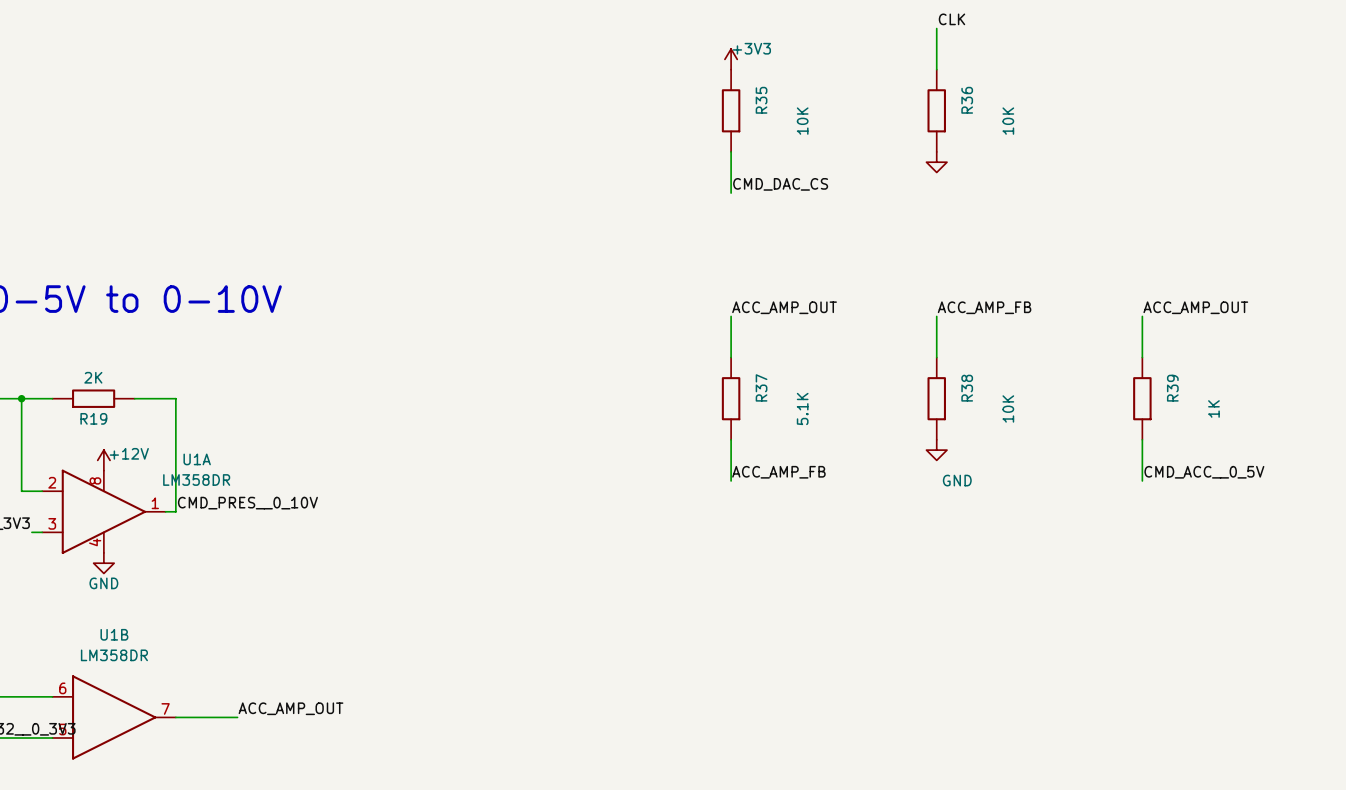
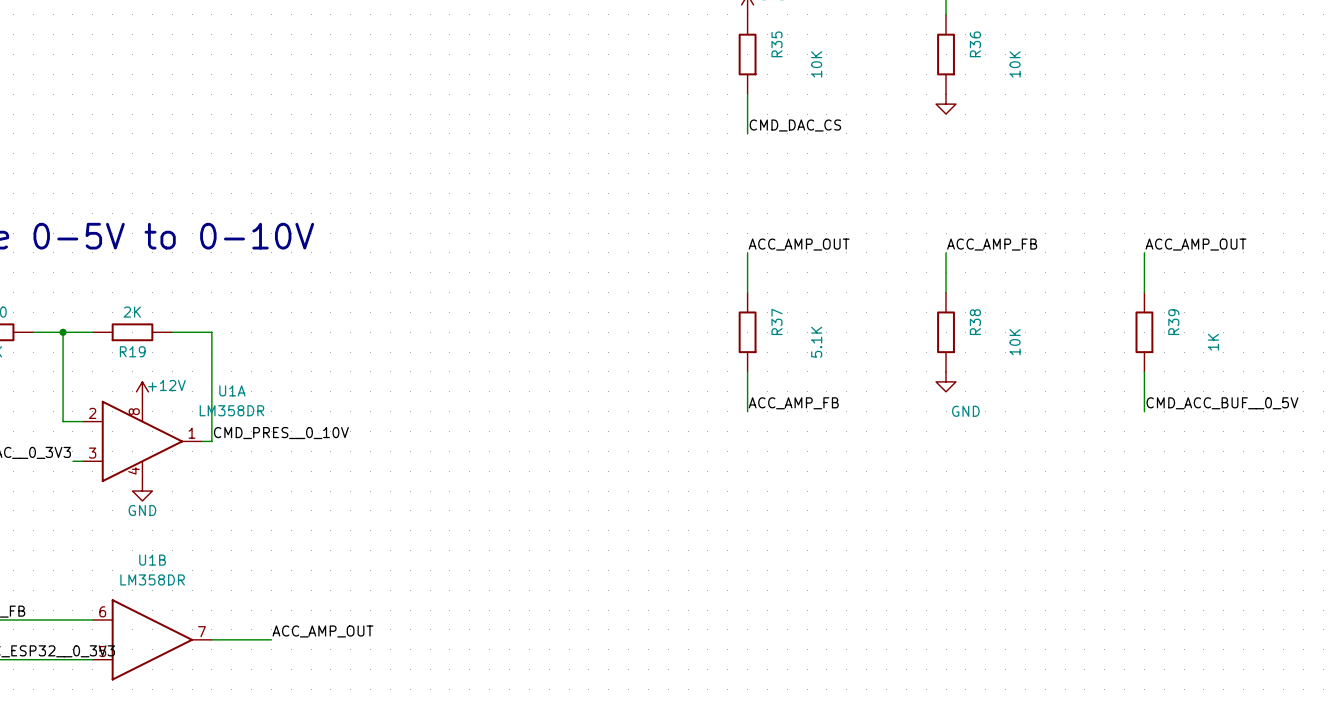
label: CMD_ACC__0_5V (1204, 472) -> CMD_ACC_BUF__0_5V (1222, 403)

